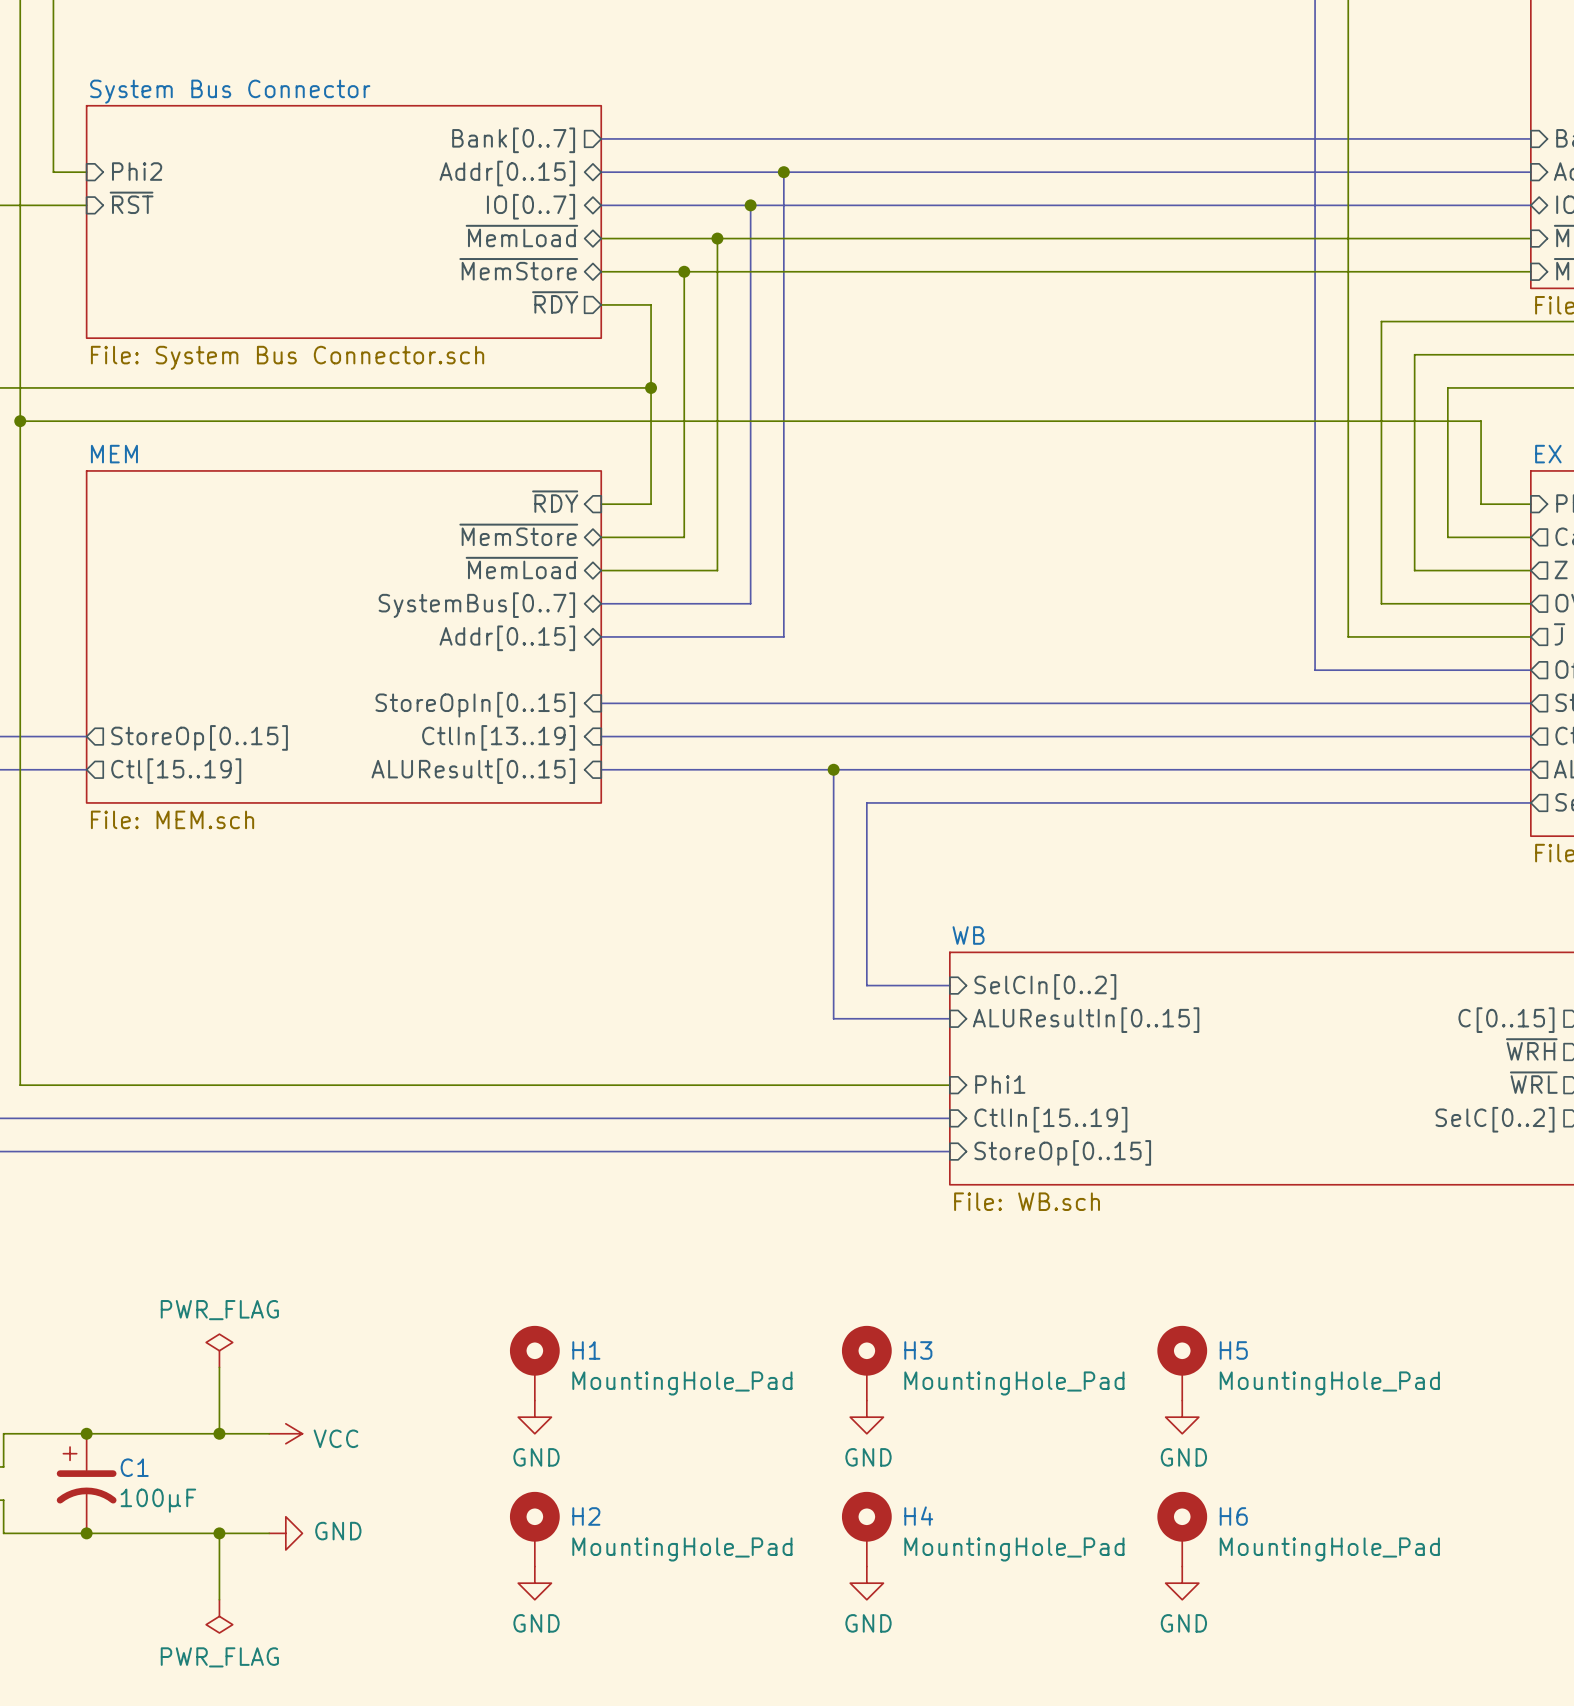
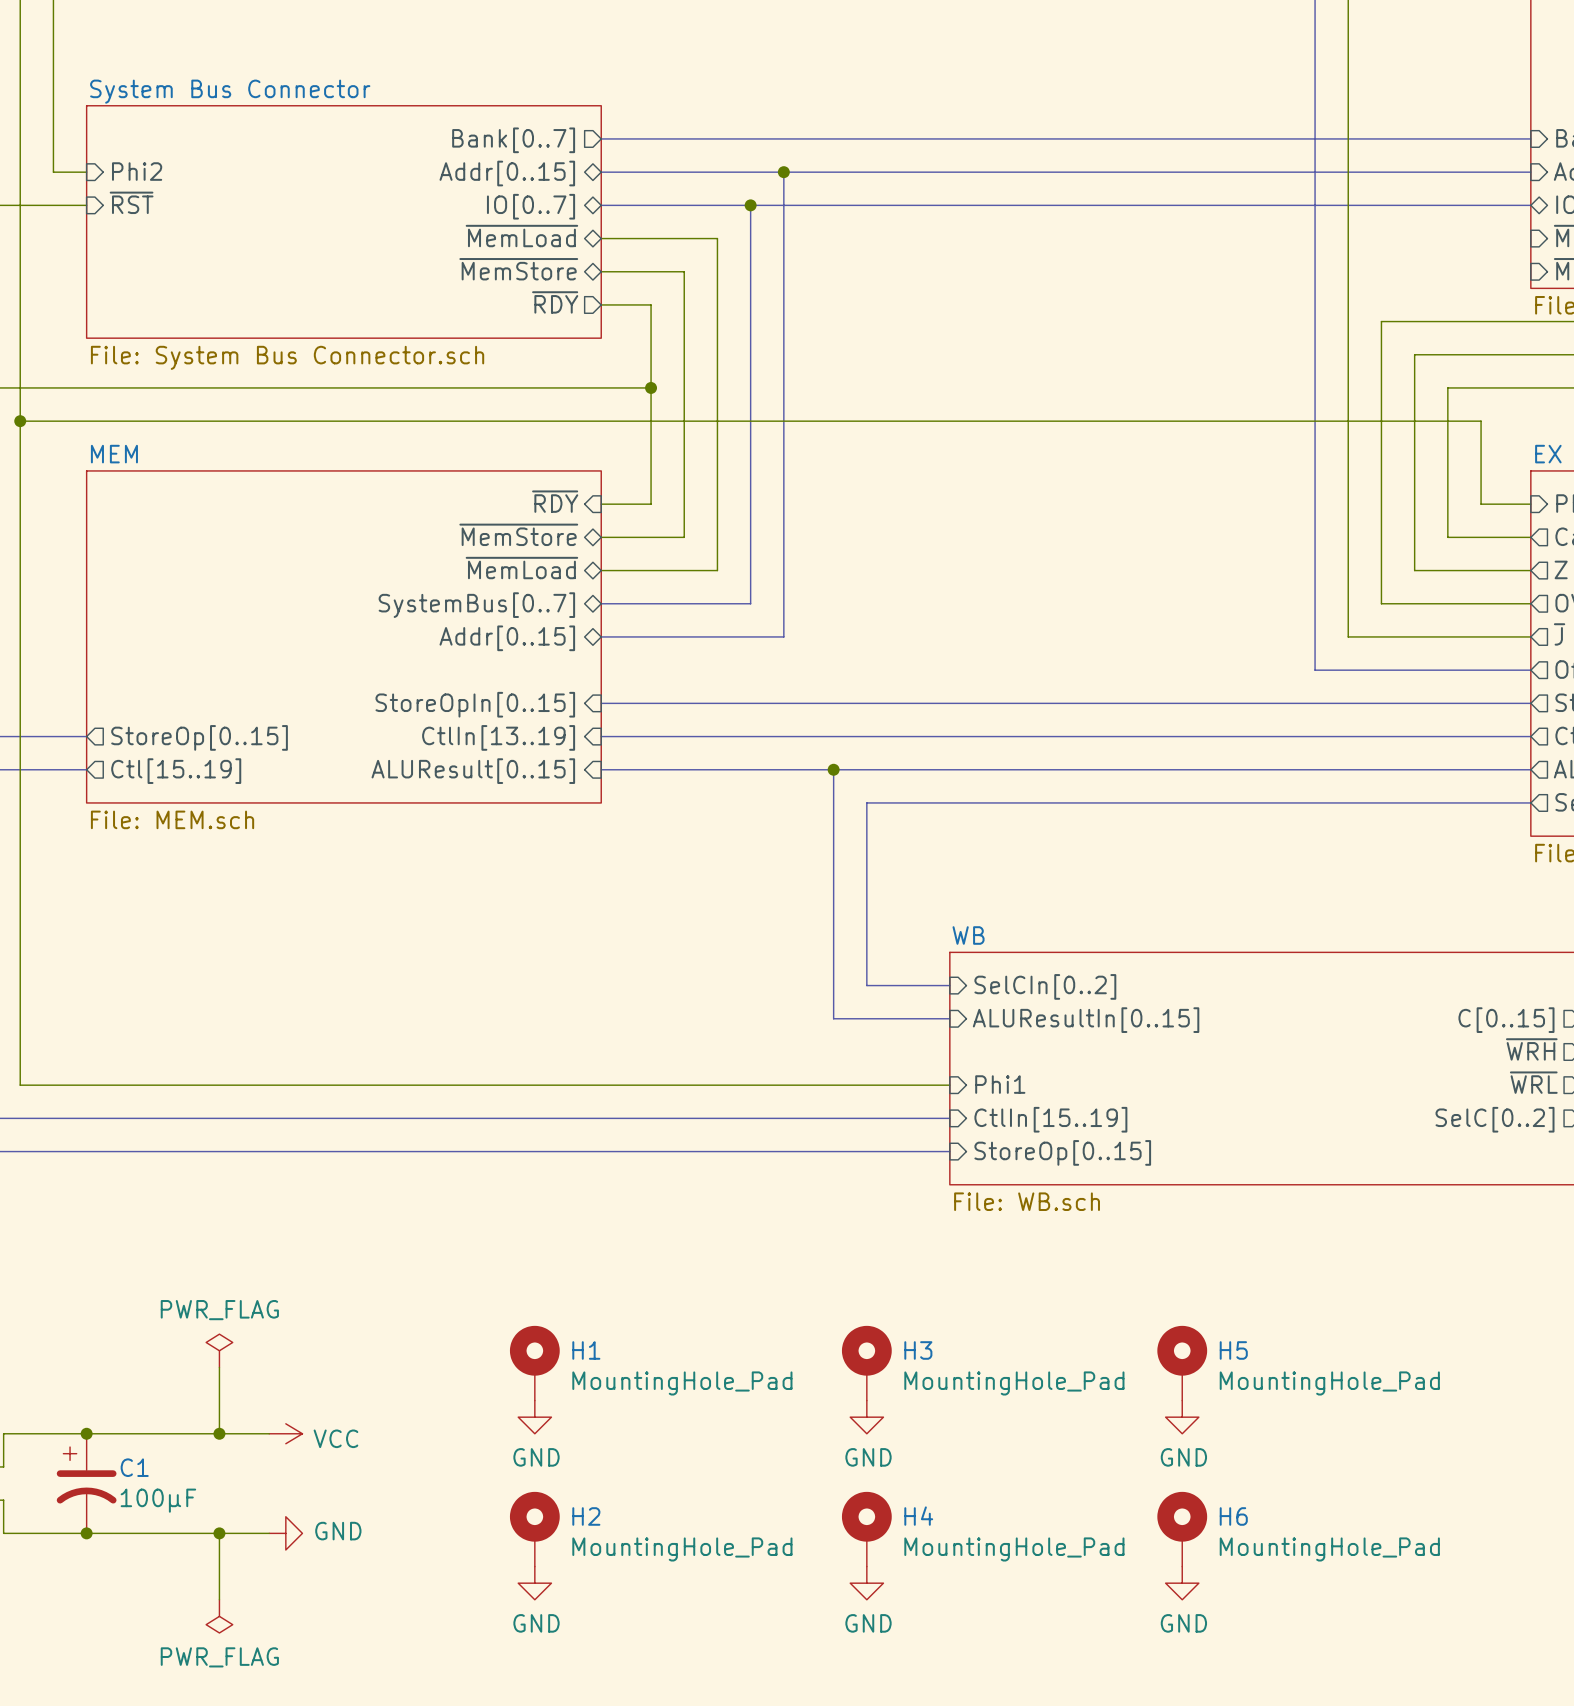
wire: (717, 238) (1530, 238) -> none
junction: (717, 238) -> none
wire: (684, 271) (1530, 271) -> none
junction: (684, 271) -> none

